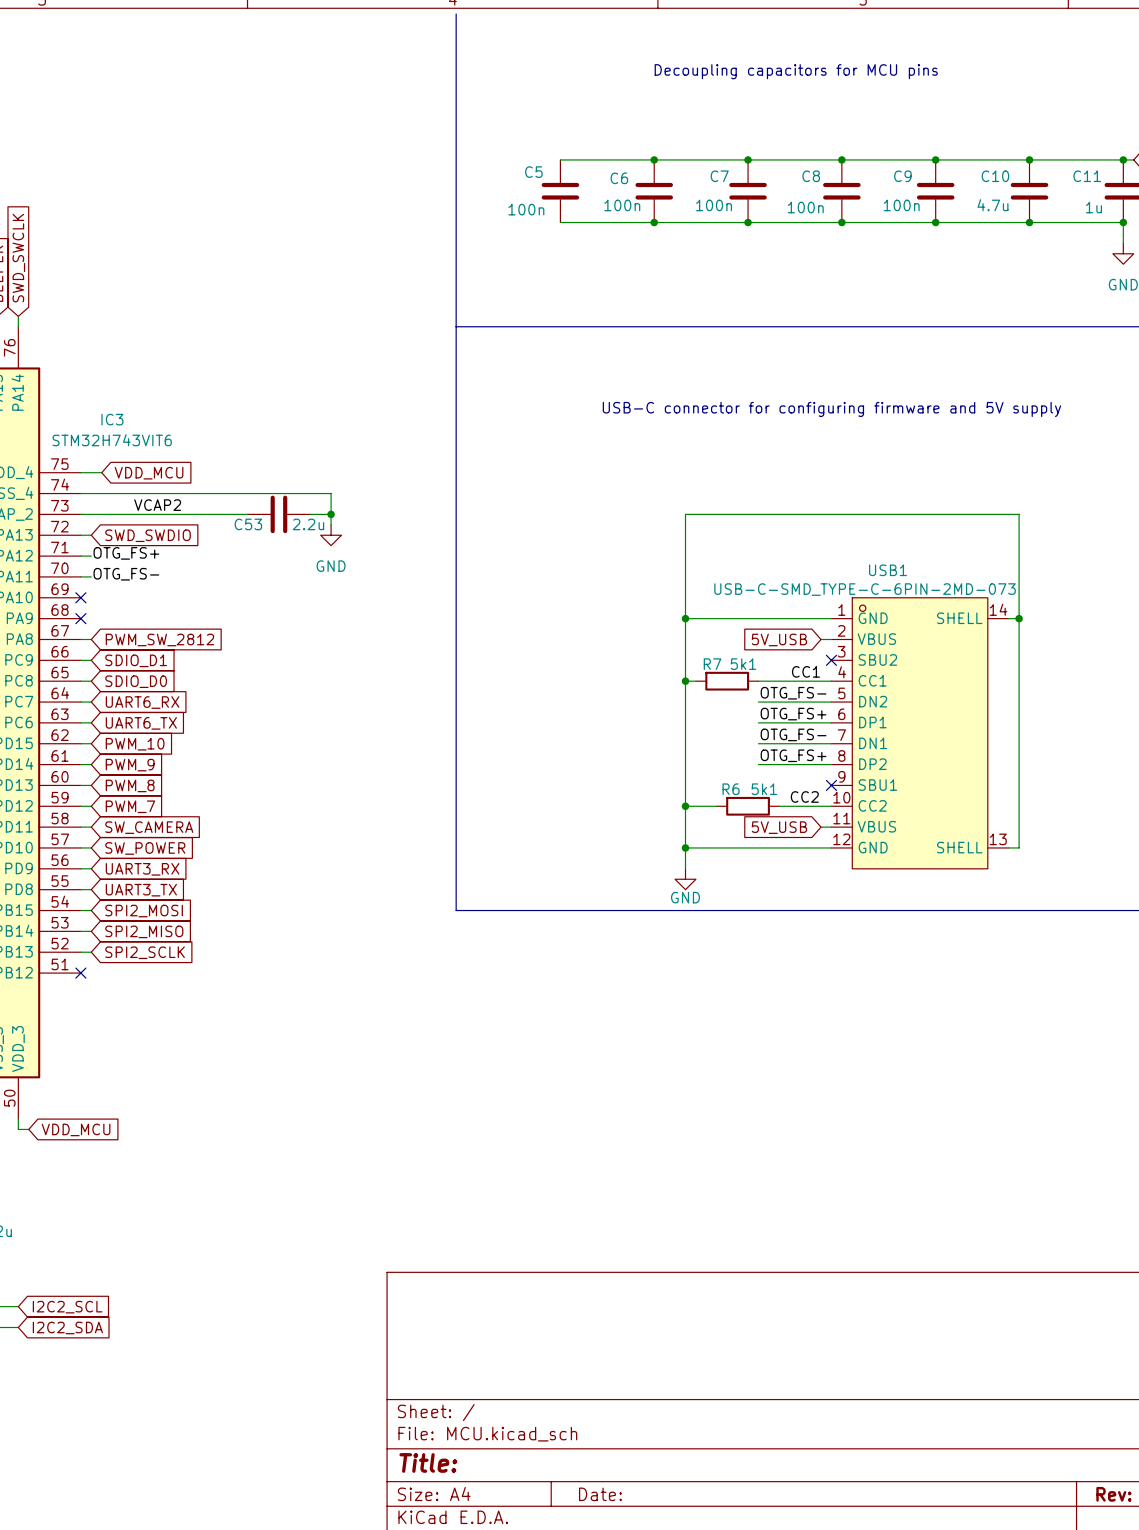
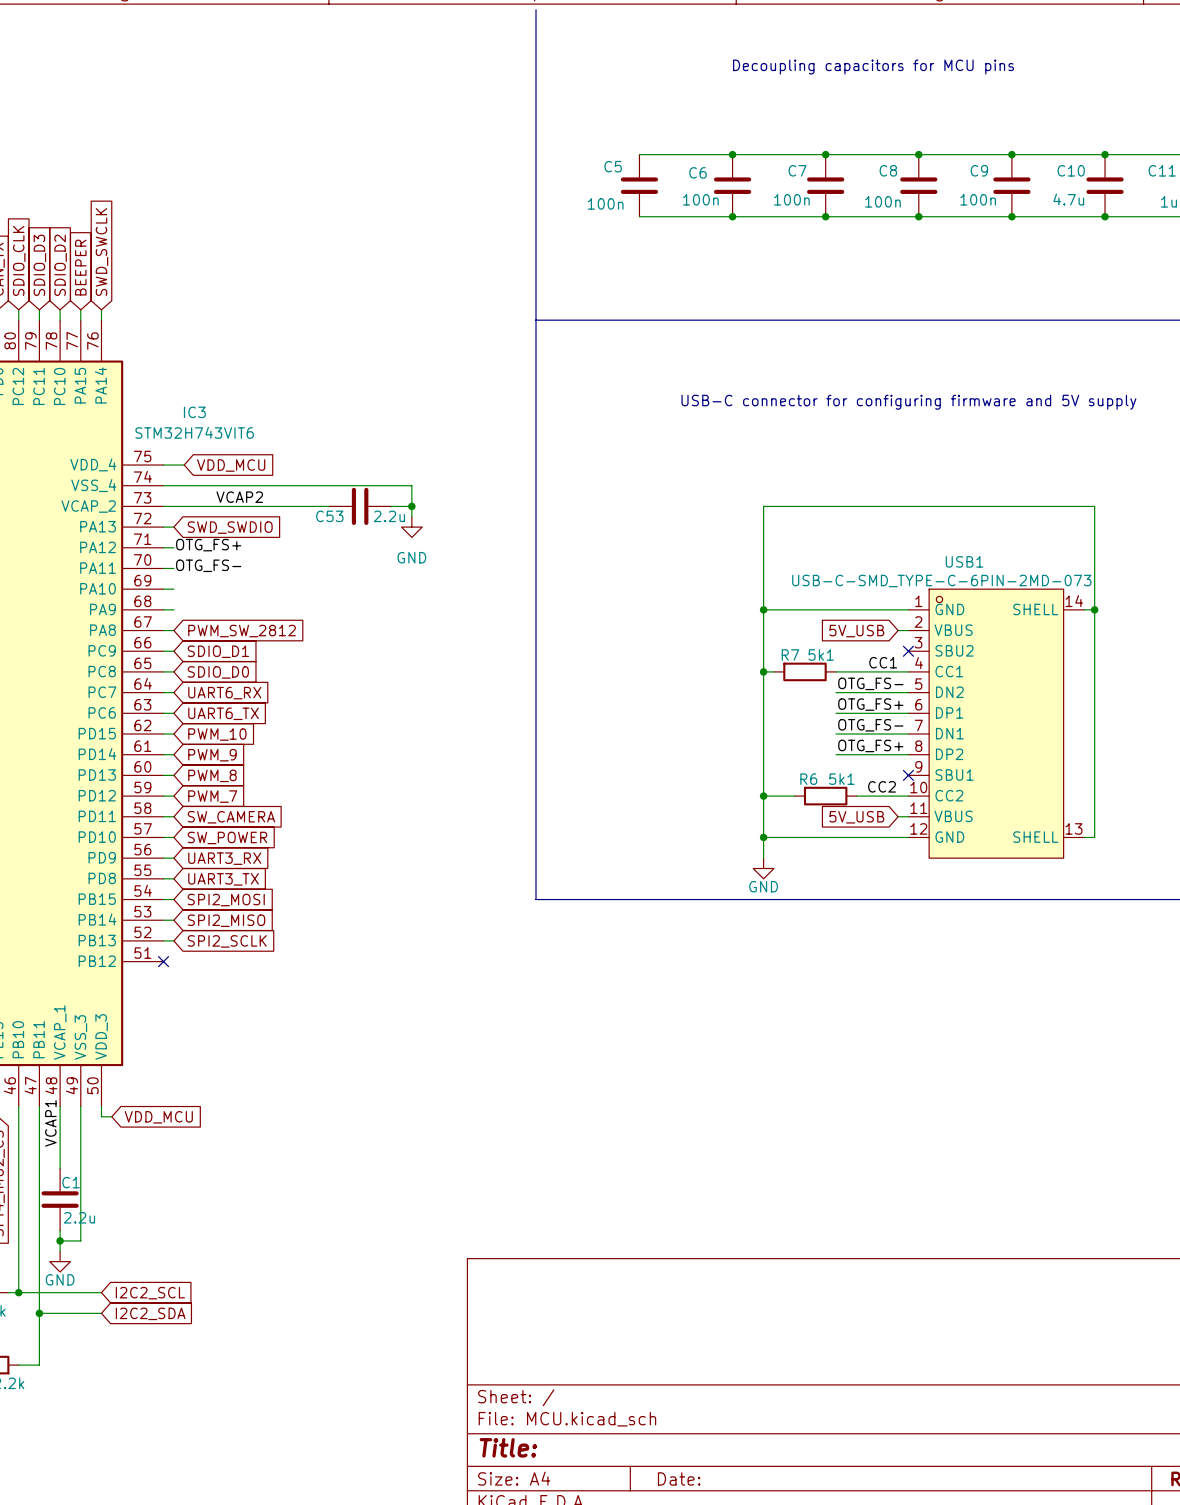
wire: none -> (163, 589) (173, 589)
no-connect mark: (80, 597) -> none
wire: none -> (163, 609) (173, 609)
no-connect mark: (80, 618) -> none

